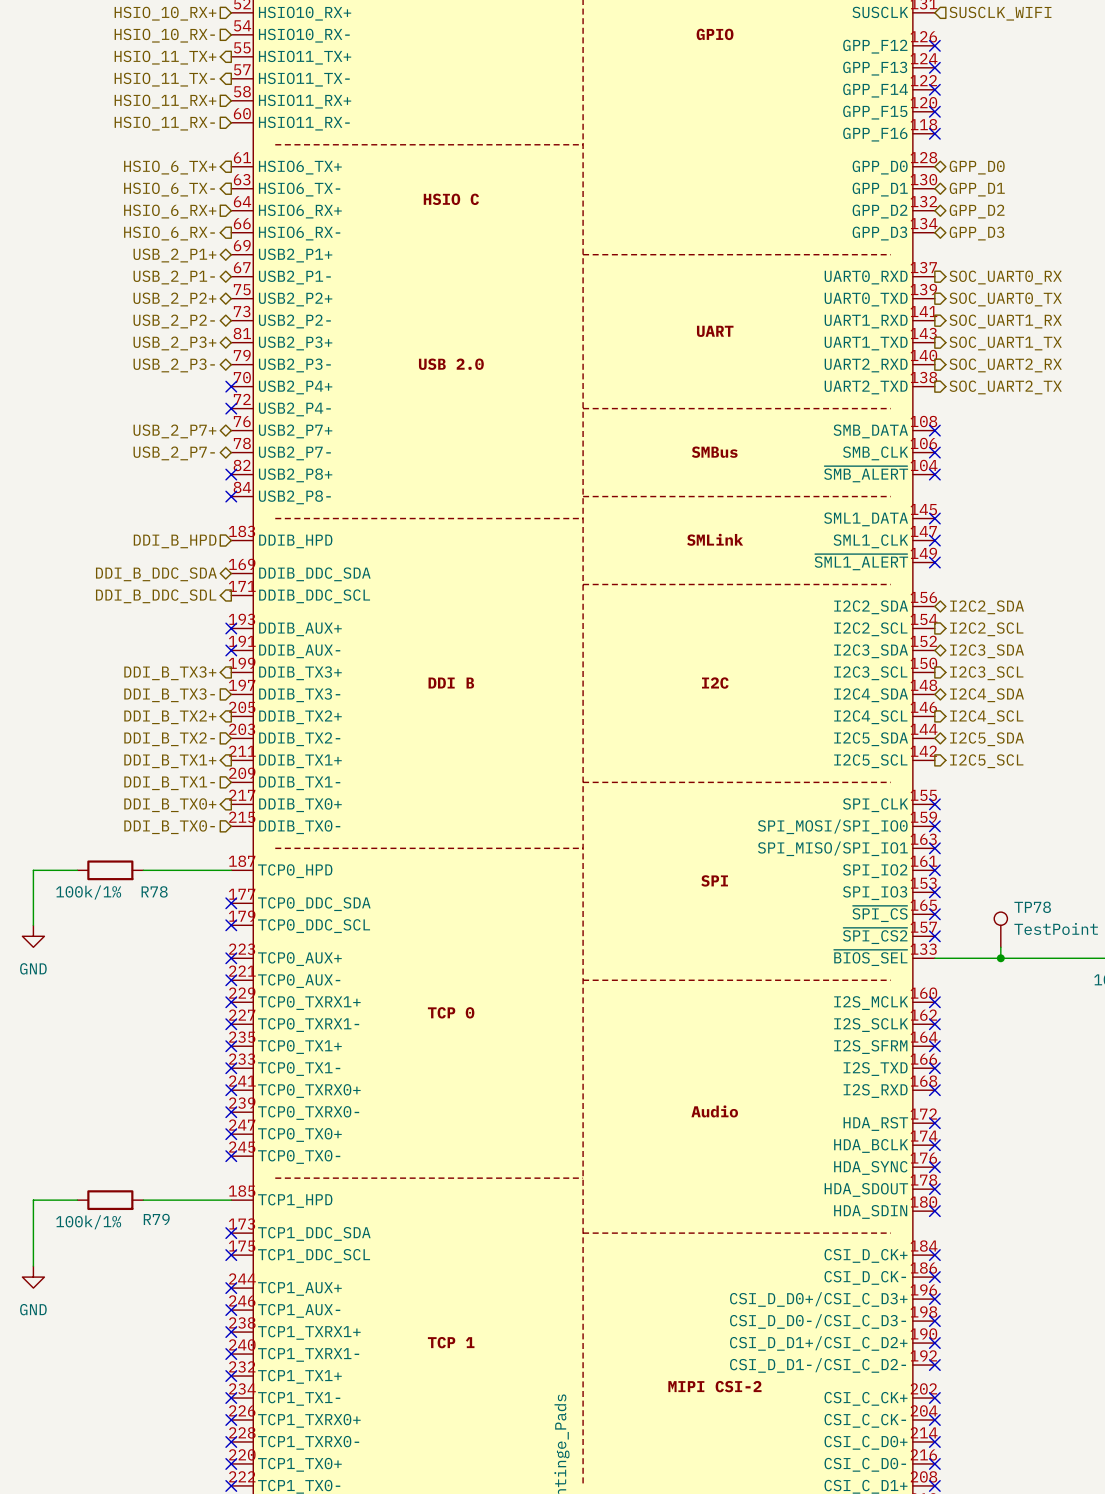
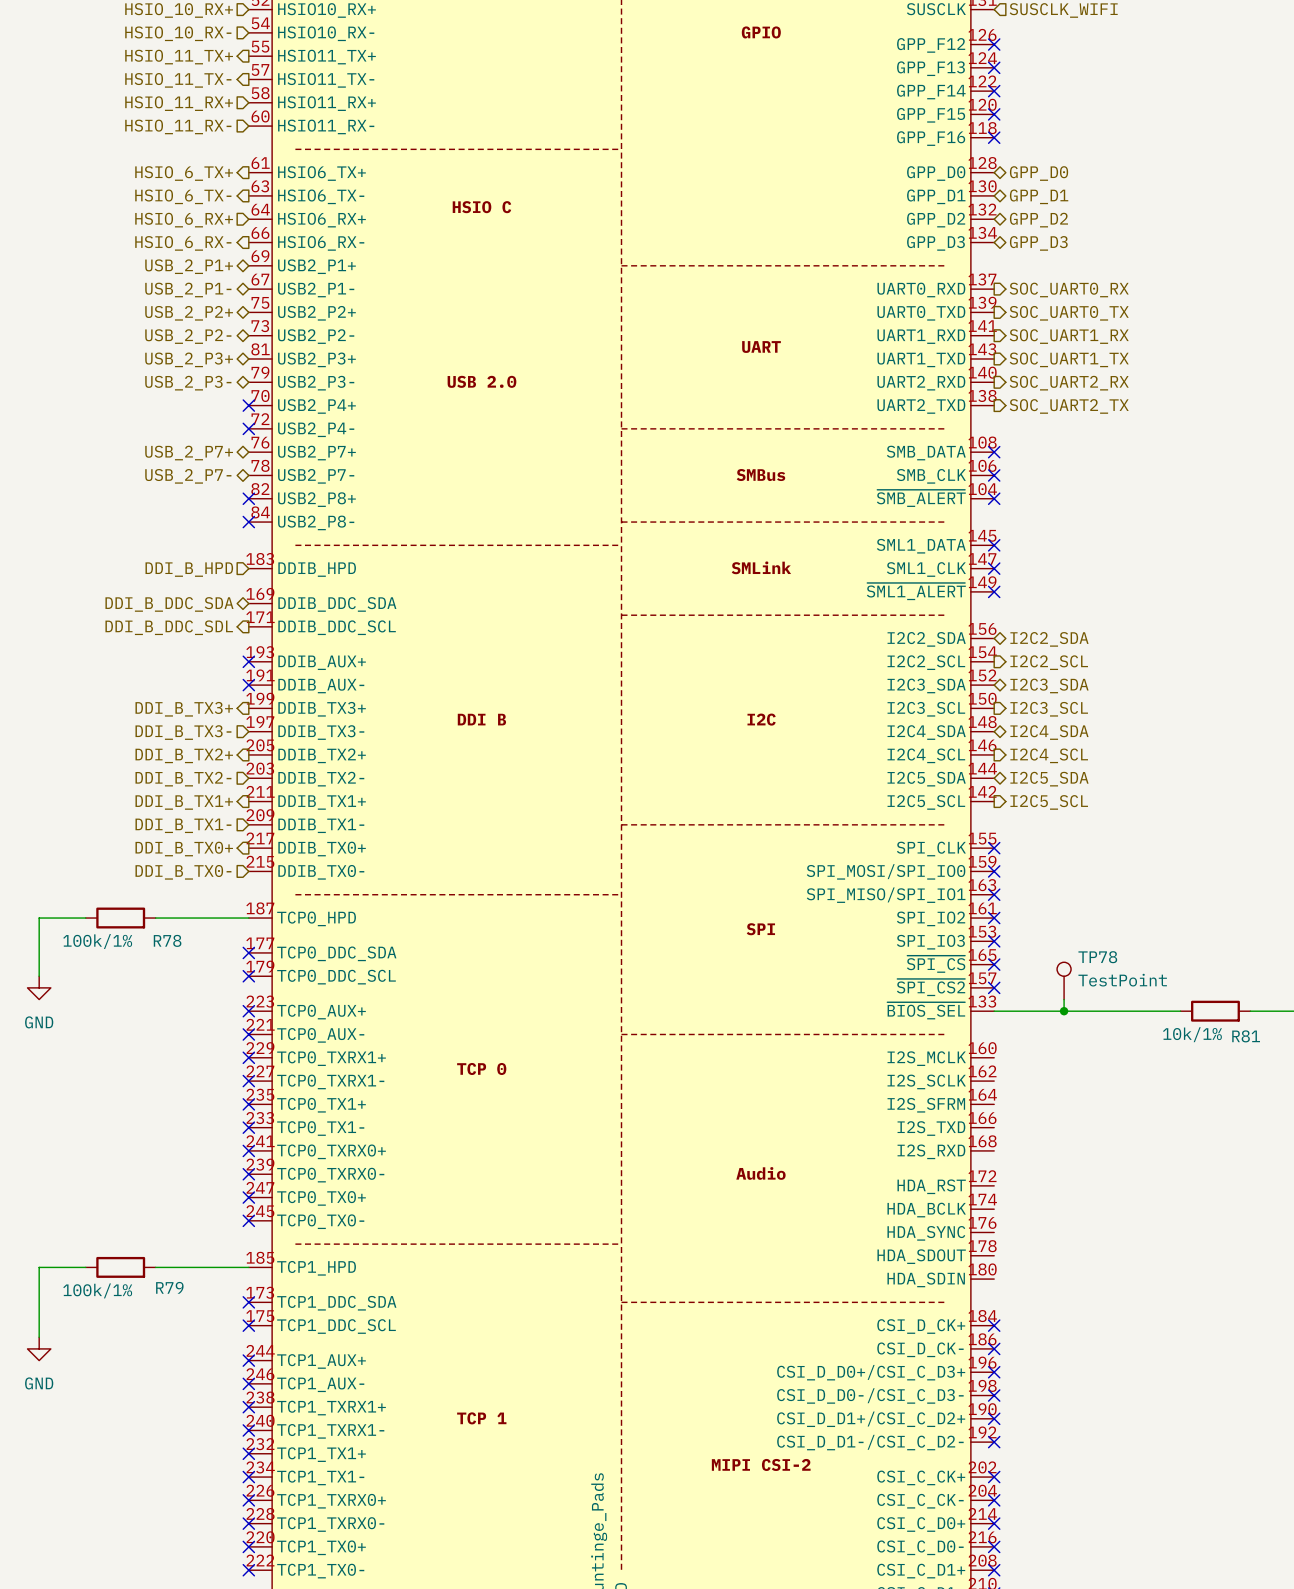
no-connect mark: (934, 1002) -> none
no-connect mark: (934, 1024) -> none
no-connect mark: (934, 1046) -> none
no-connect mark: (934, 1068) -> none
no-connect mark: (934, 1090) -> none
no-connect mark: (934, 1123) -> none
no-connect mark: (934, 1145) -> none
no-connect mark: (934, 1167) -> none
no-connect mark: (934, 1189) -> none
no-connect mark: (934, 1211) -> none

